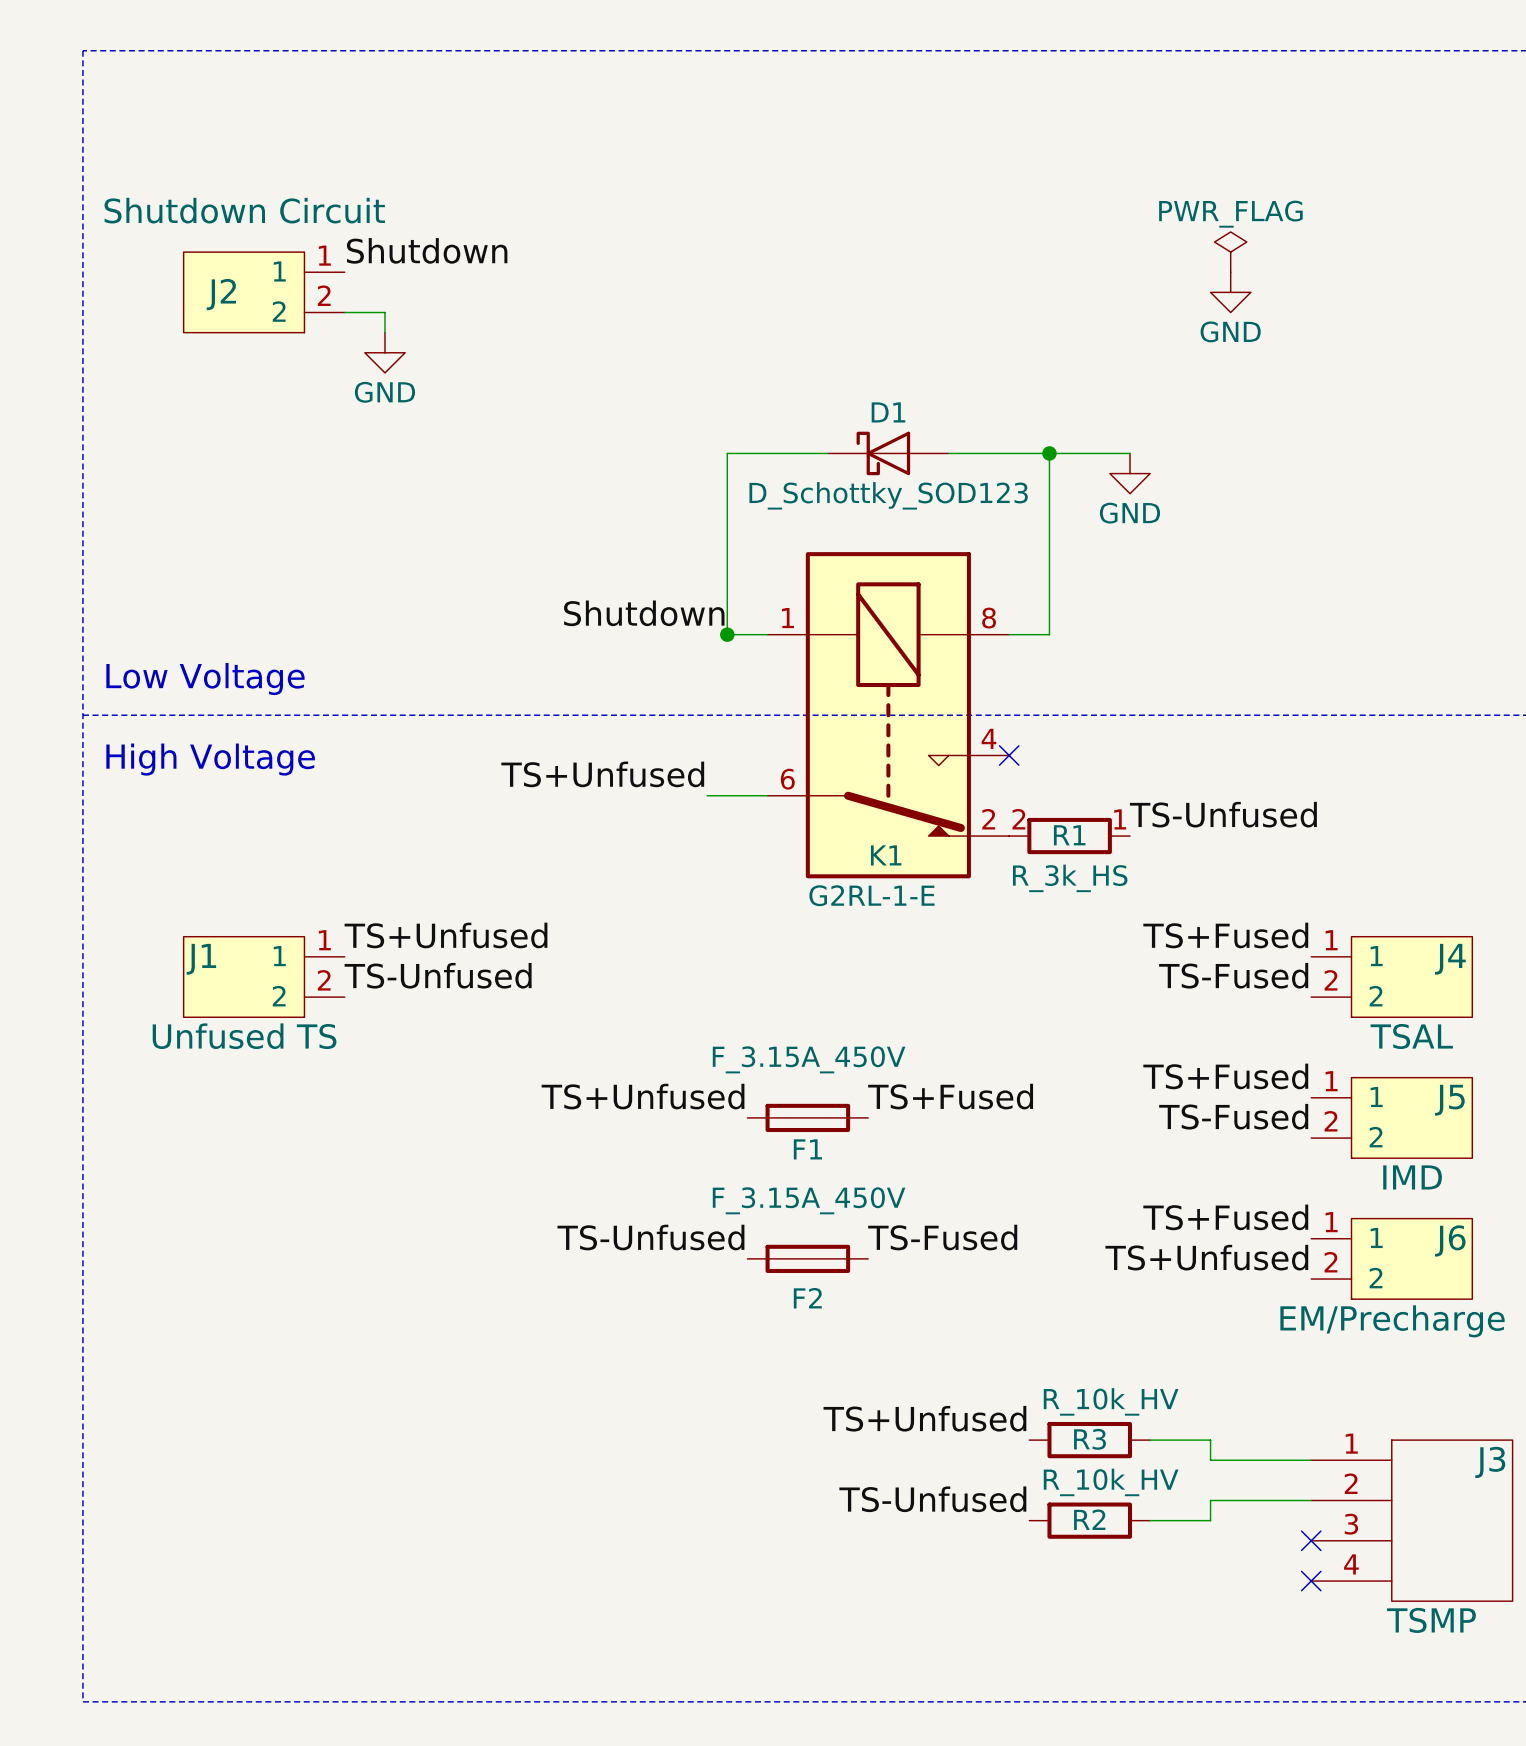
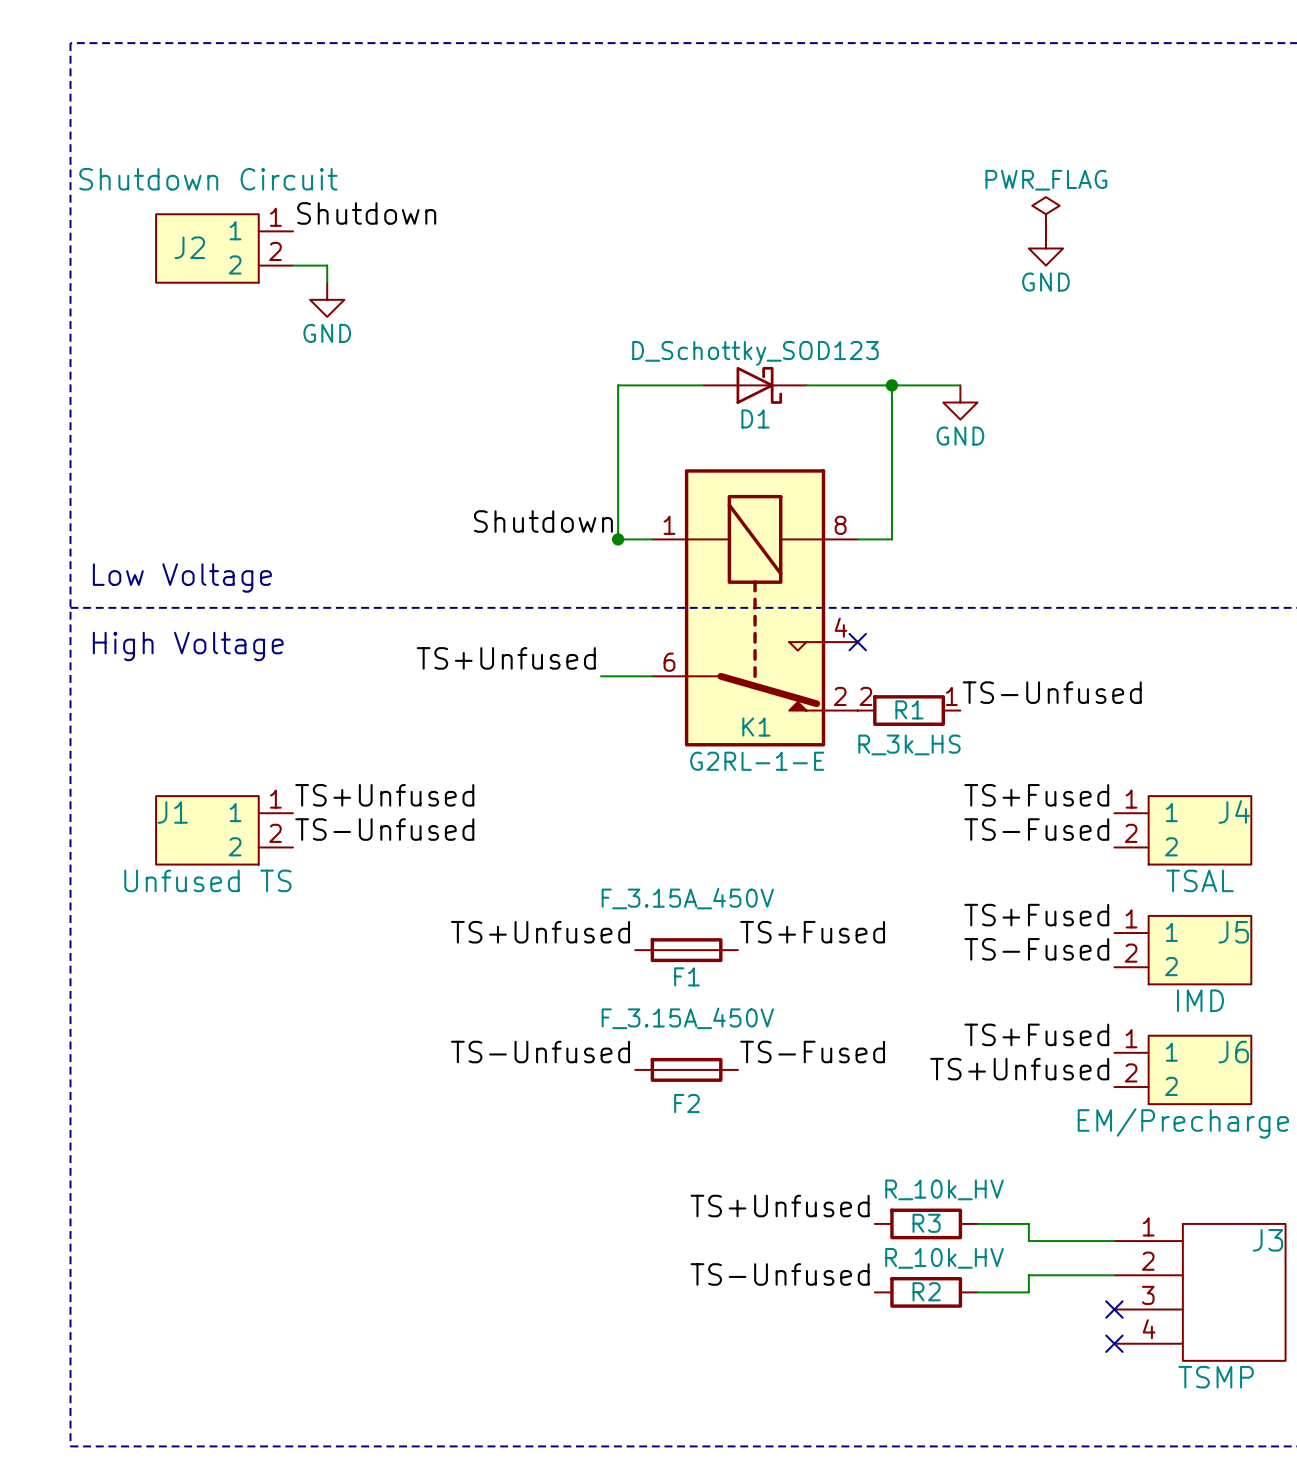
D1 rotation: 0° (883, 453) -> 180° (759, 385)

